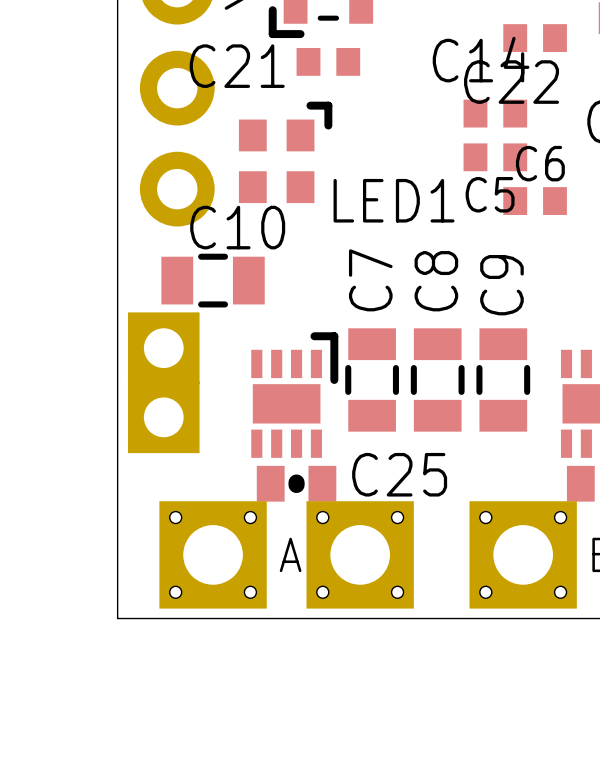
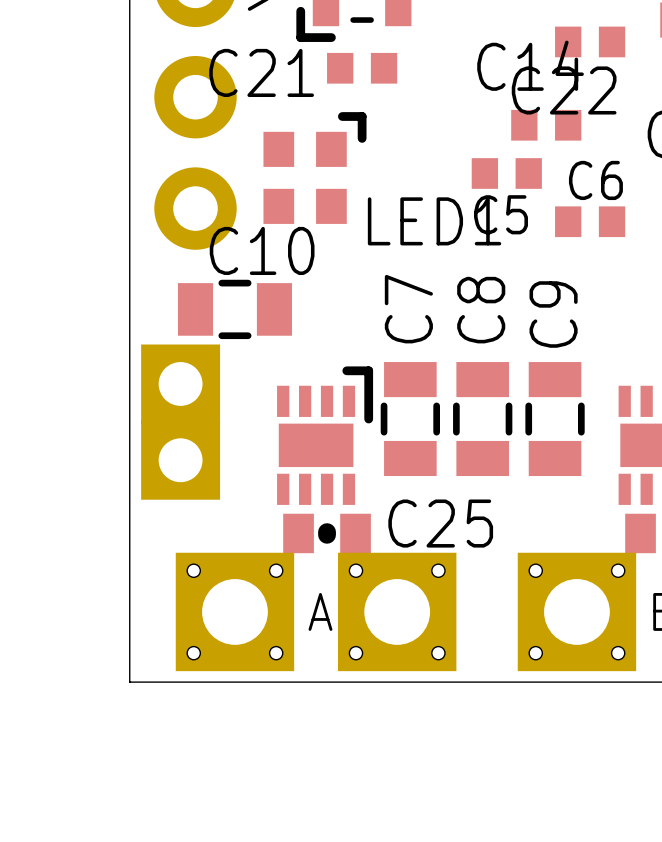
C5 position: (495, 157) -> (506, 173)

